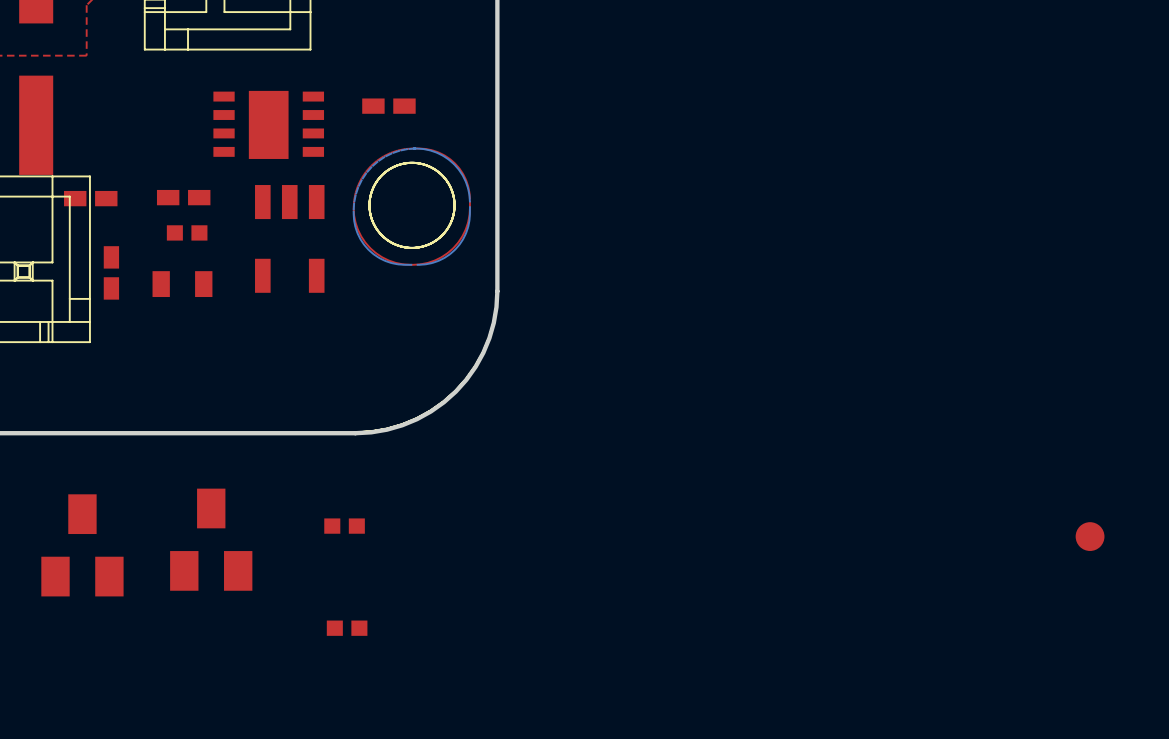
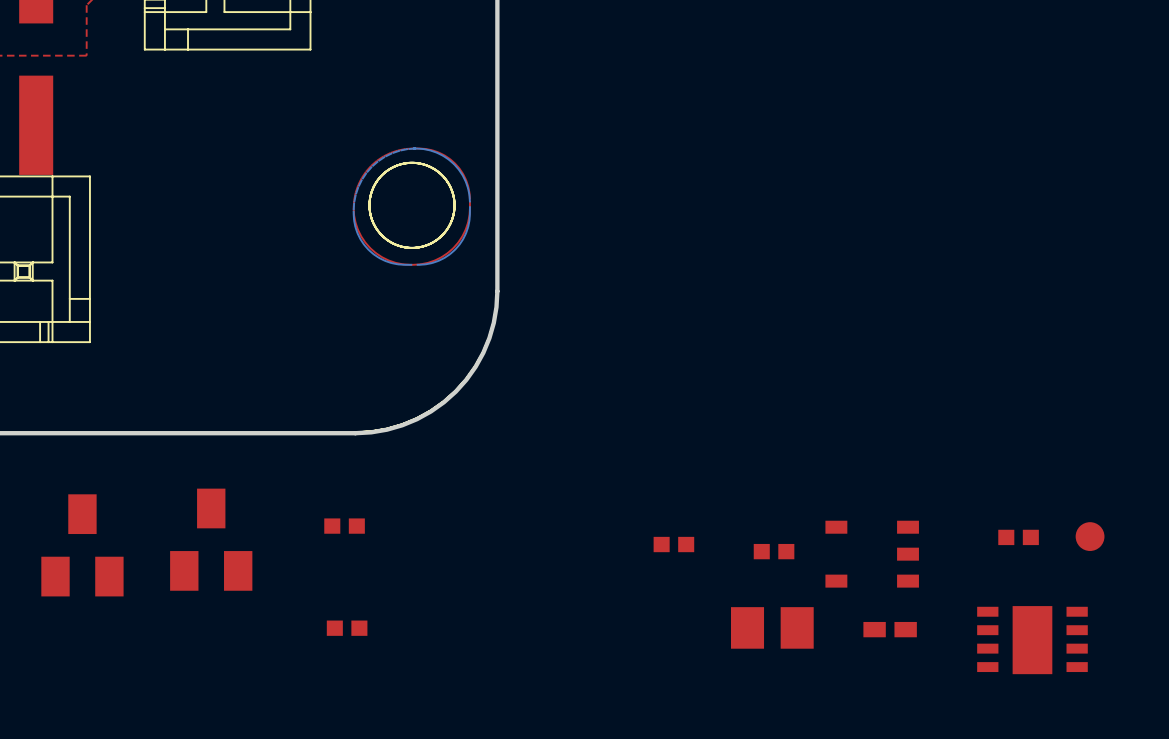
part: (388, 106) -> none
part: (268, 124) -> none
part: (183, 197) -> none
part: (90, 198) -> none
part: (187, 232) -> none
part: (289, 238) -> none
part: (111, 272) -> none
part: (182, 284) -> none
part: none -> (1018, 537)
part: none -> (673, 544)
part: none -> (774, 551)
part: none -> (872, 554)
part: none -> (772, 627)
part: none -> (890, 629)
part: none -> (1032, 640)

